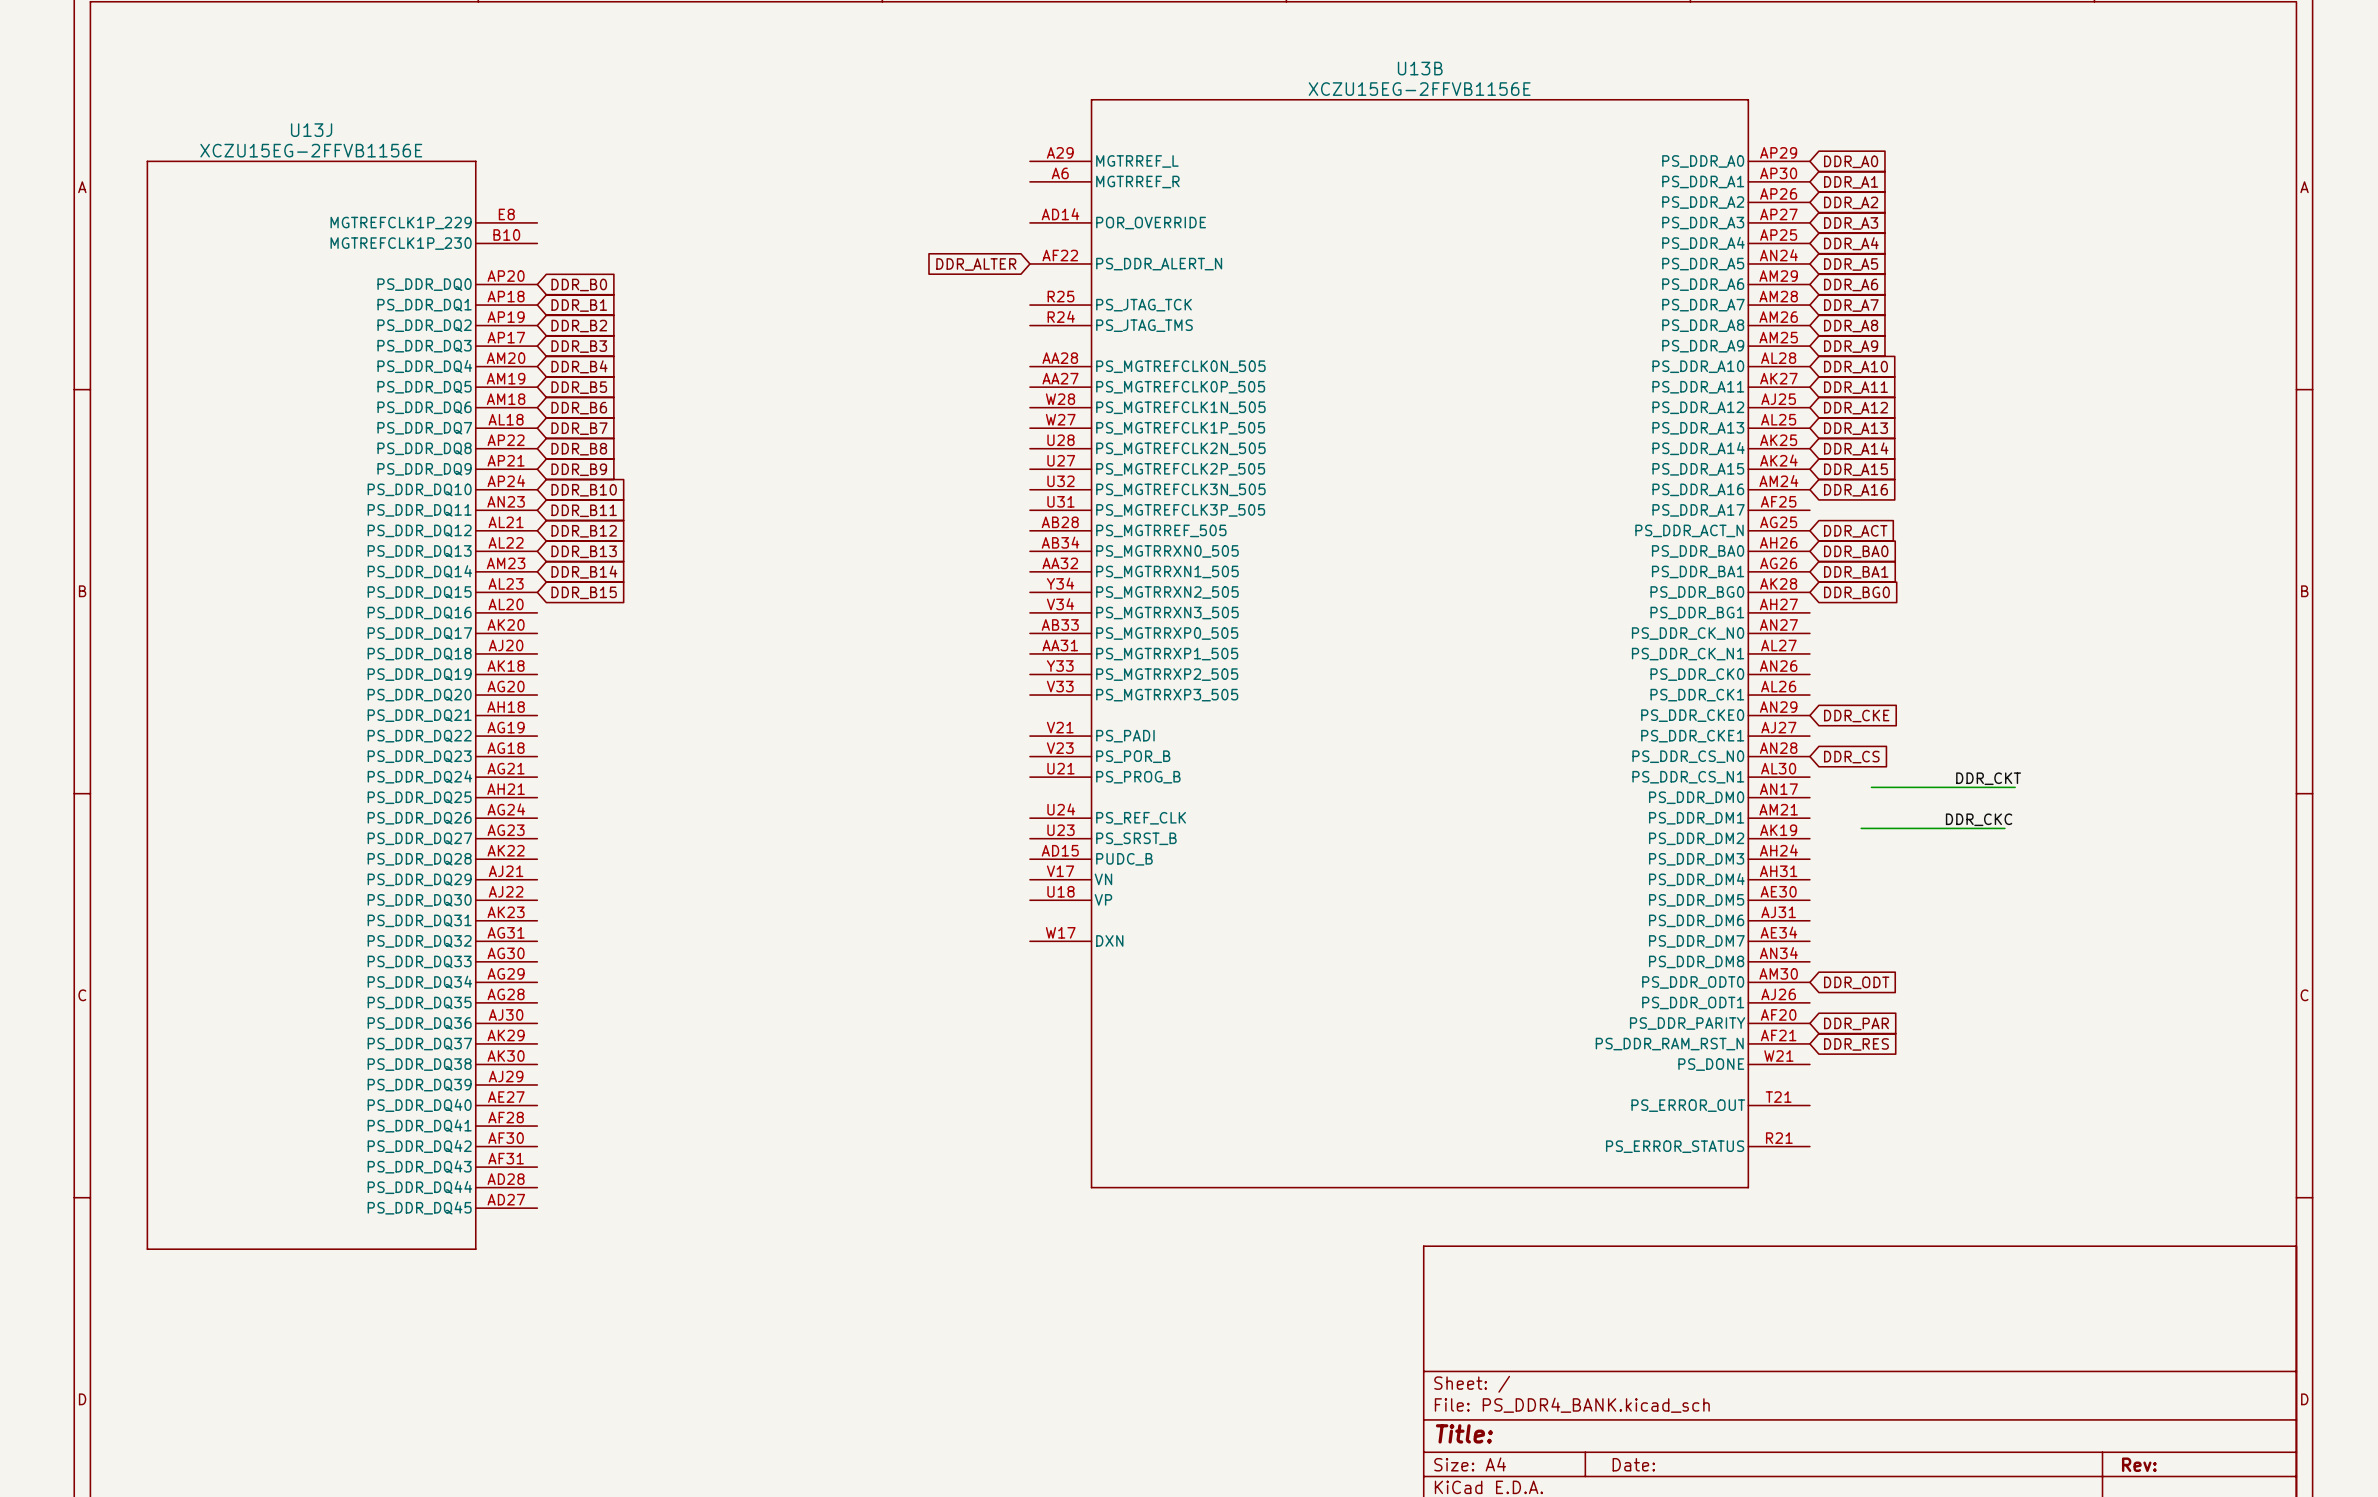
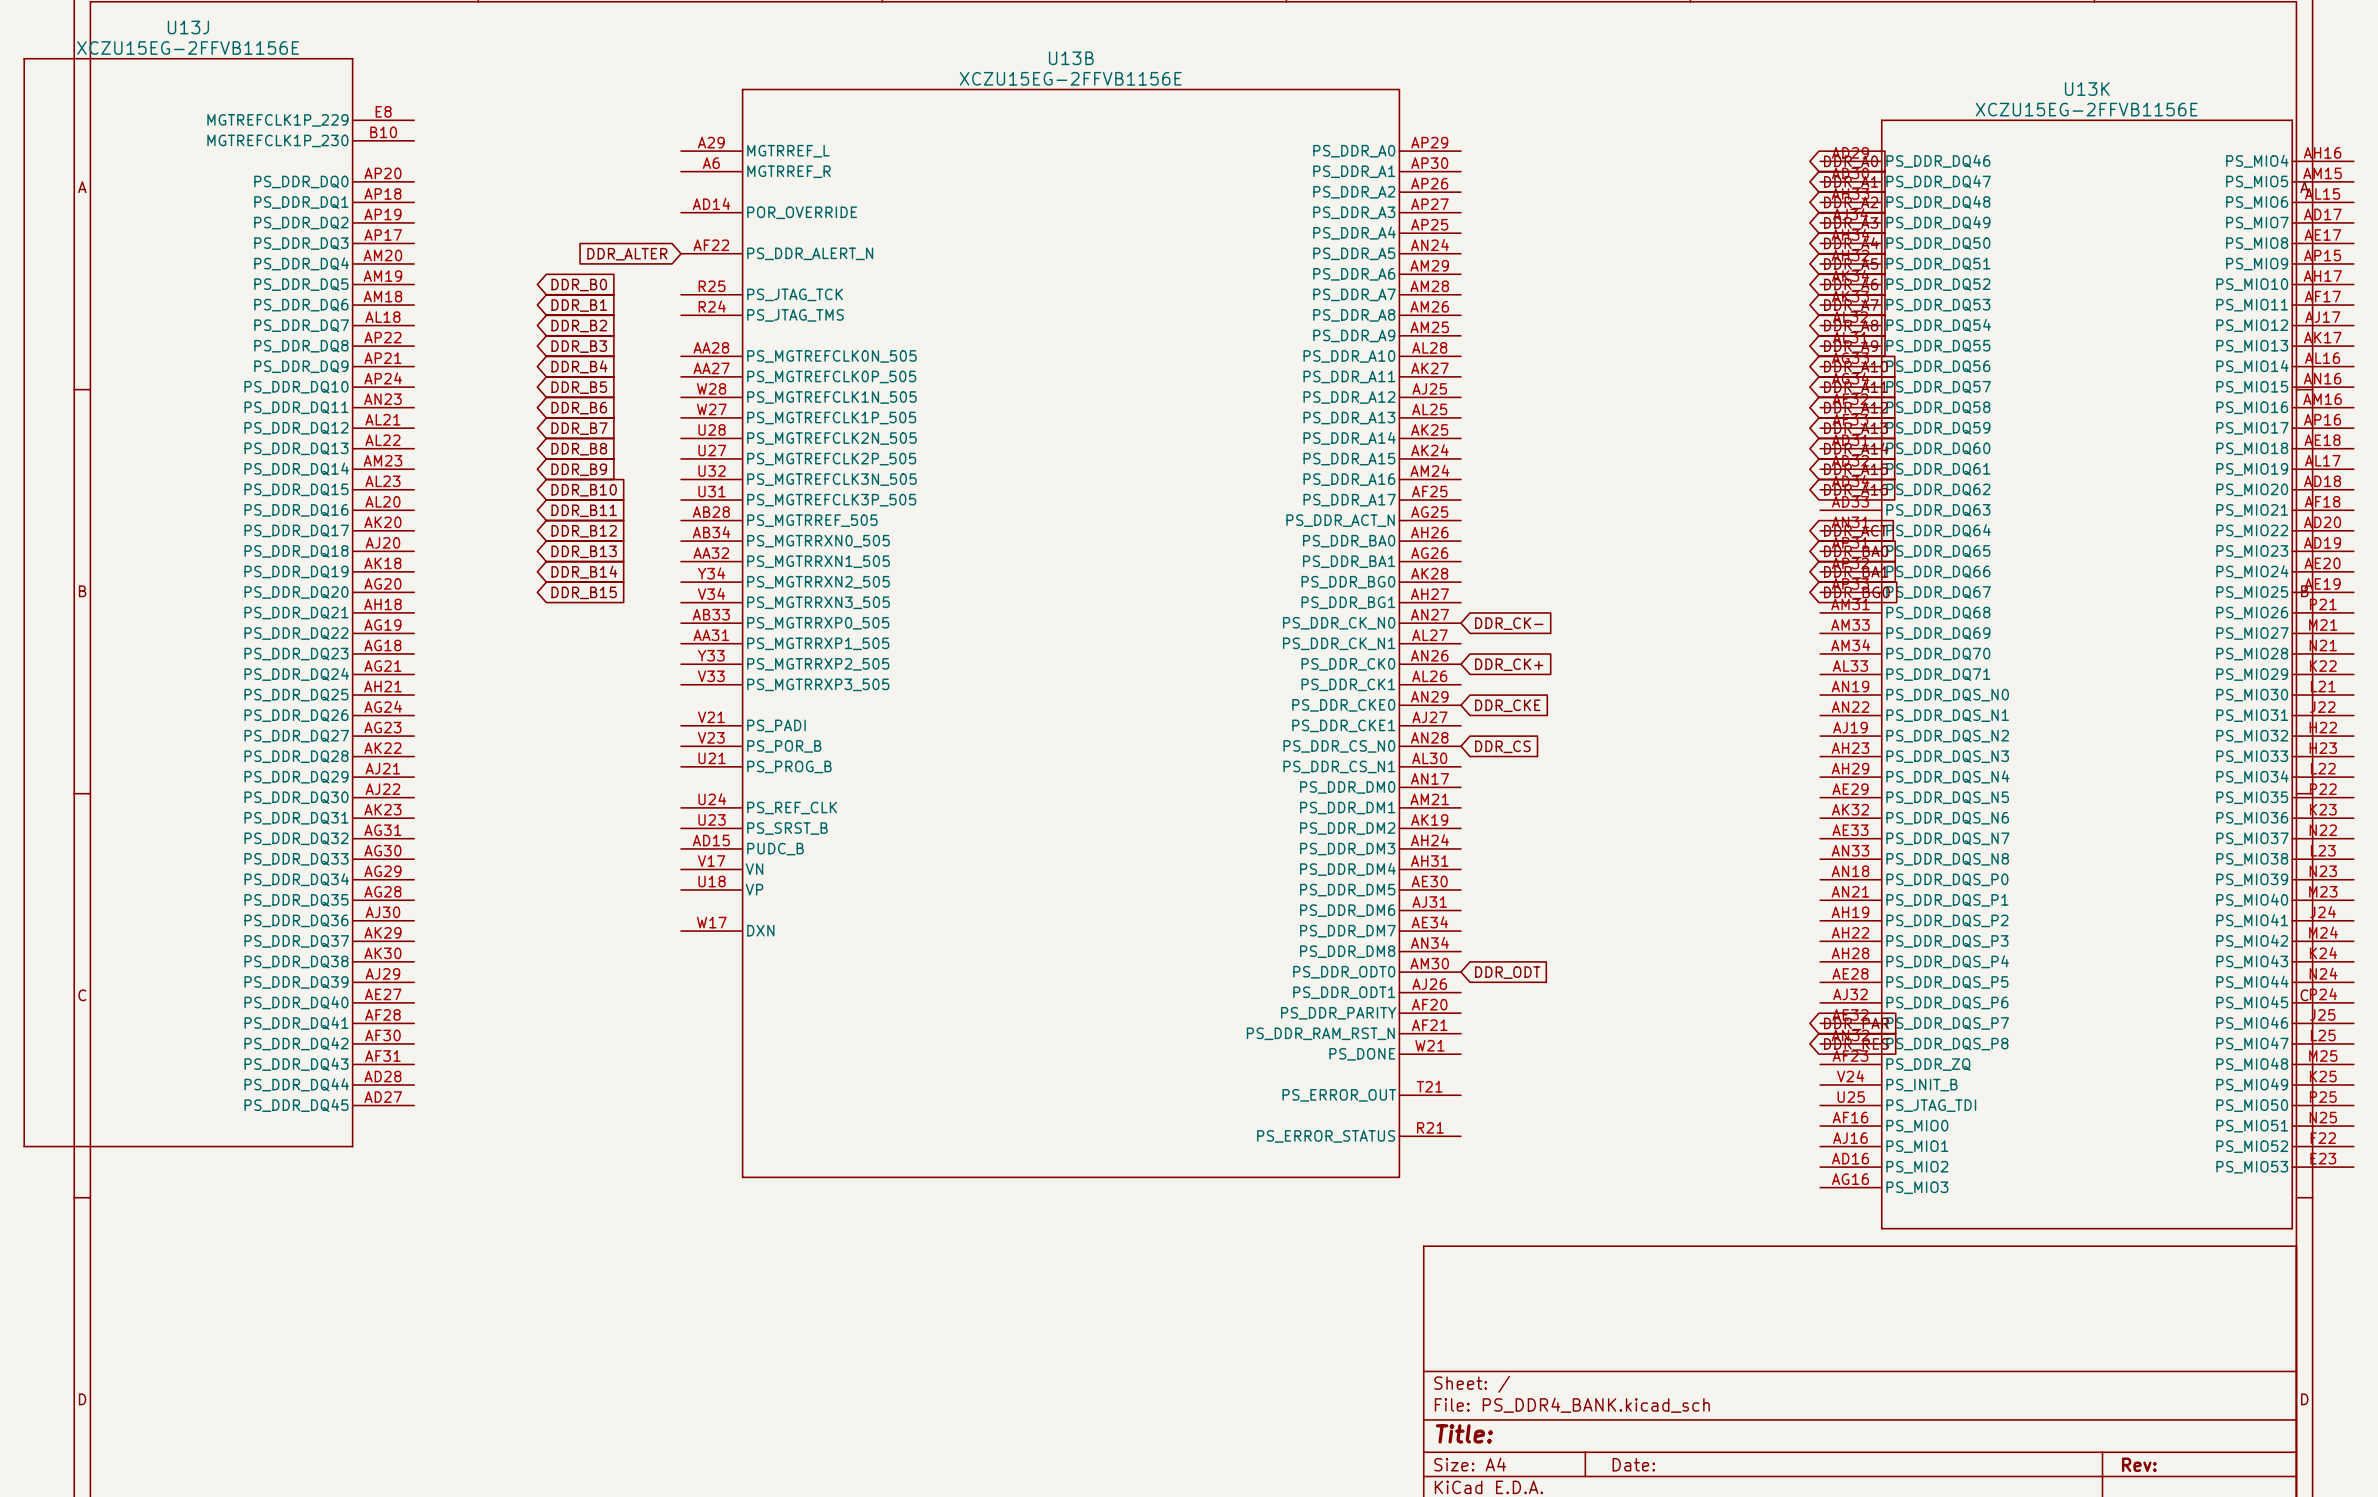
global label: none -> DDR_ALTER (627, 254)
global label: DDR_ALTER (976, 264) -> none
global label: none -> DDR_CK- (1509, 623)
U13B position: (1419, 643) -> (1071, 633)
global label: none -> DDR_CK+ (1509, 664)
U13K: none -> XCZU15EG-2FFVB1156E (2086, 674)
U13J position: (342, 705) -> (218, 602)
global label: none -> DDR_CKE (1507, 705)
global label: DDR_CKE (1856, 716) -> none
global label: none -> DDR_CS (1502, 746)
global label: DDR_CS (1851, 757) -> none
label: DDR_CKT (1988, 778) -> none
wire: (1871, 787) (2015, 787) -> none
label: DDR_CKC (1979, 819) -> none
wire: (1861, 828) (2004, 828) -> none
global label: none -> DDR_ODT (1507, 972)
global label: DDR_ODT (1856, 982) -> none

